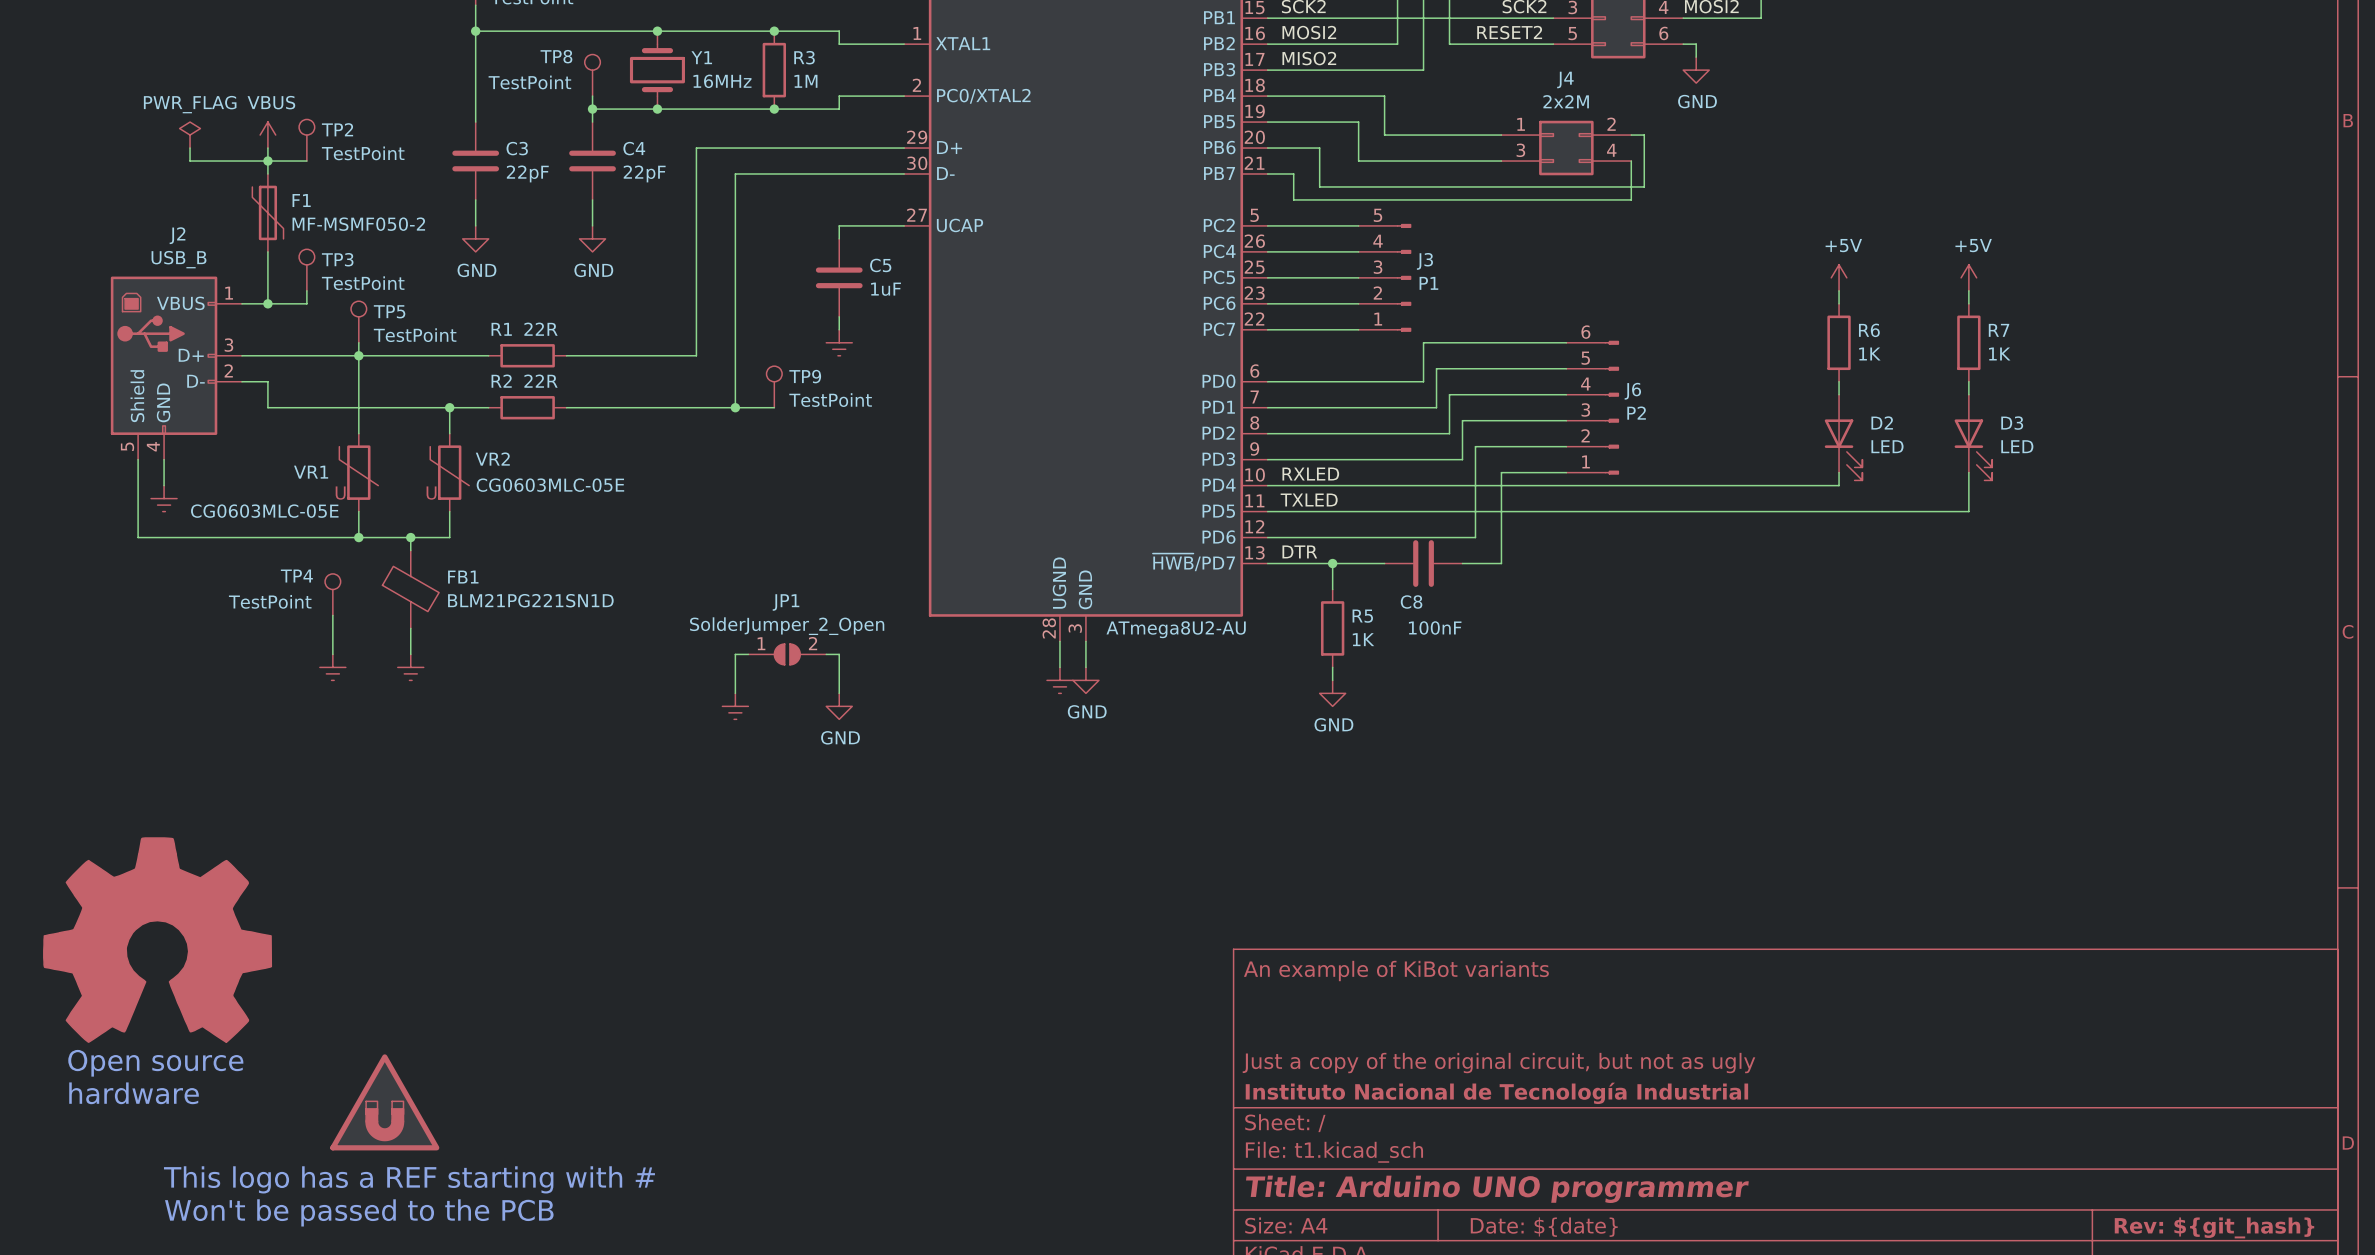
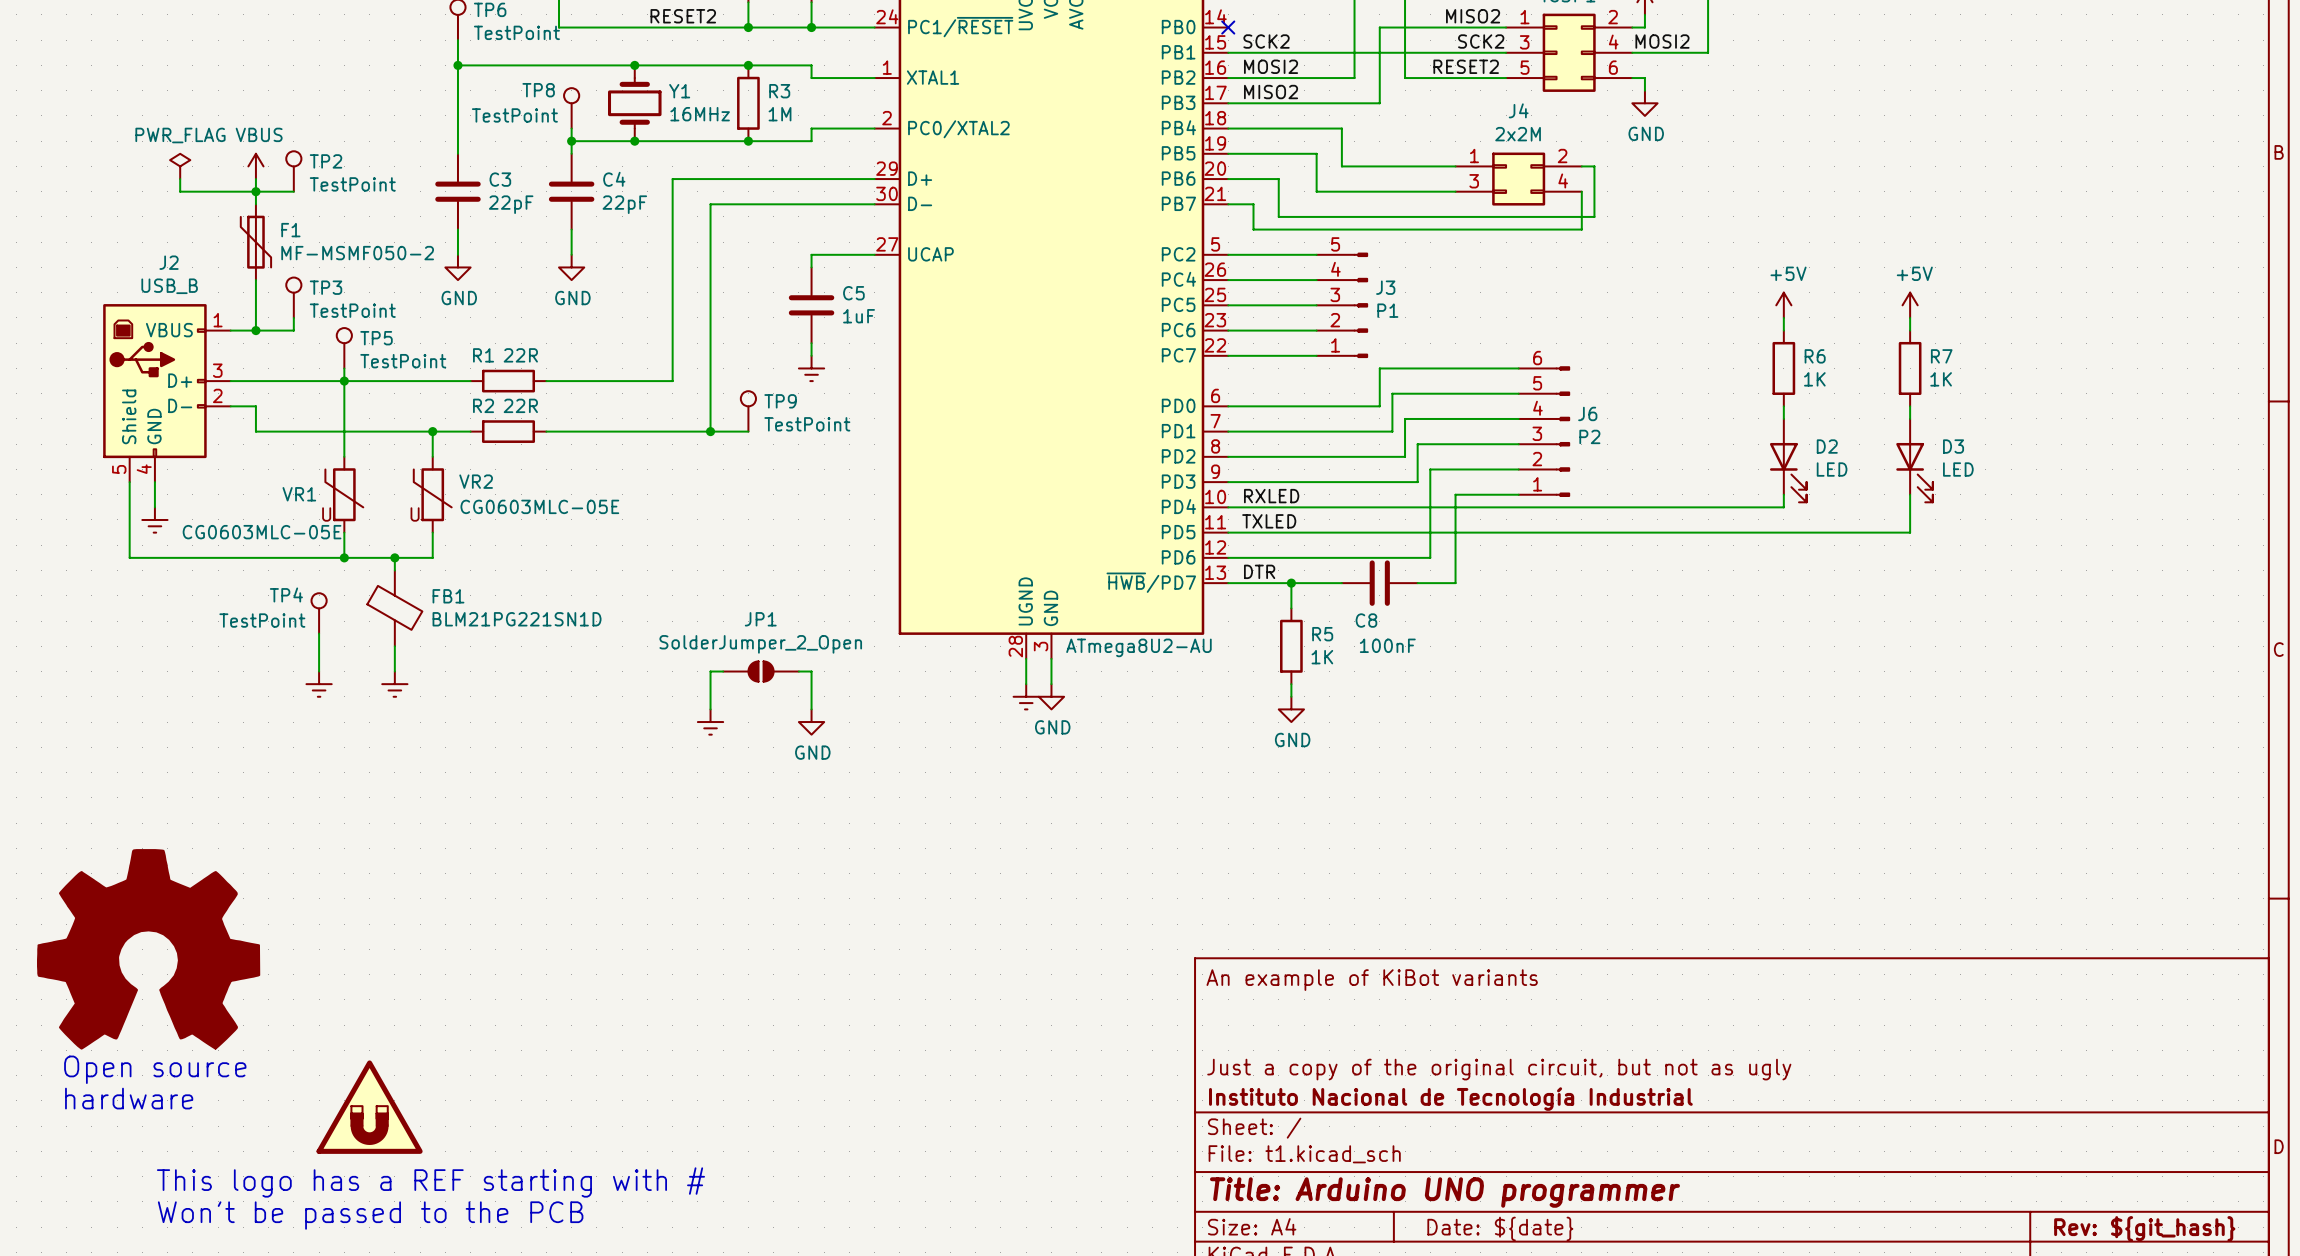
JP1 pin number: 1 (761, 643) -> none
JP1 pin number: 2 (813, 643) -> none

